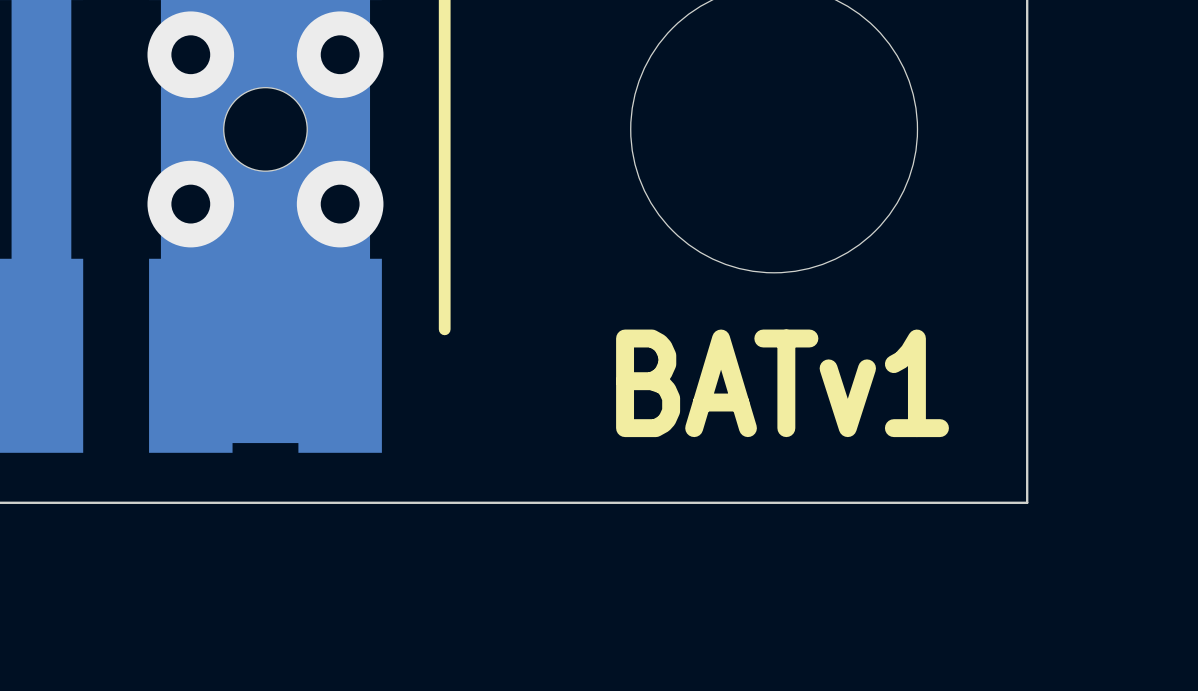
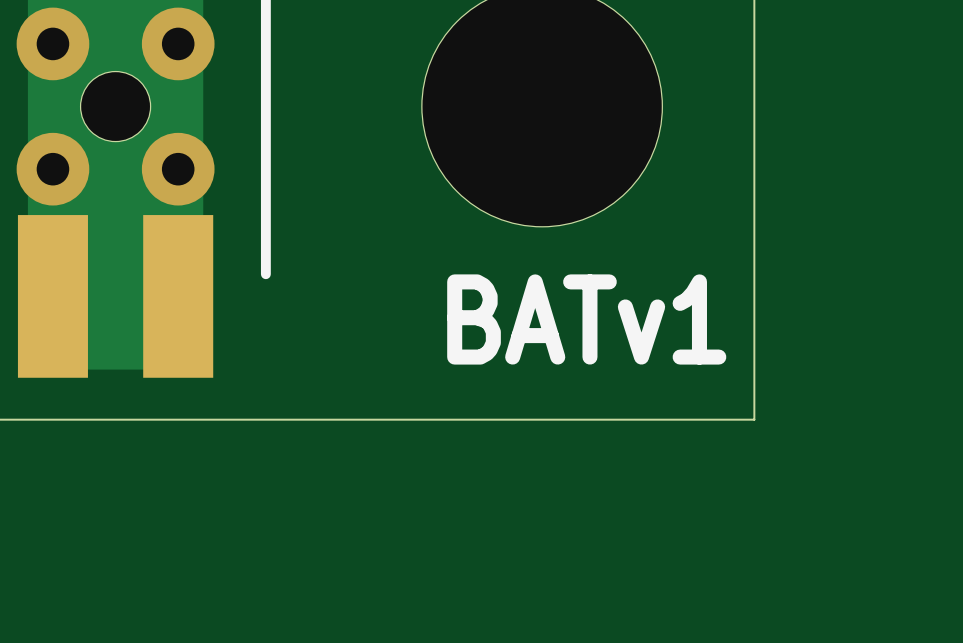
text position: BATv1 (782, 383) -> BATv1 (586, 319)

